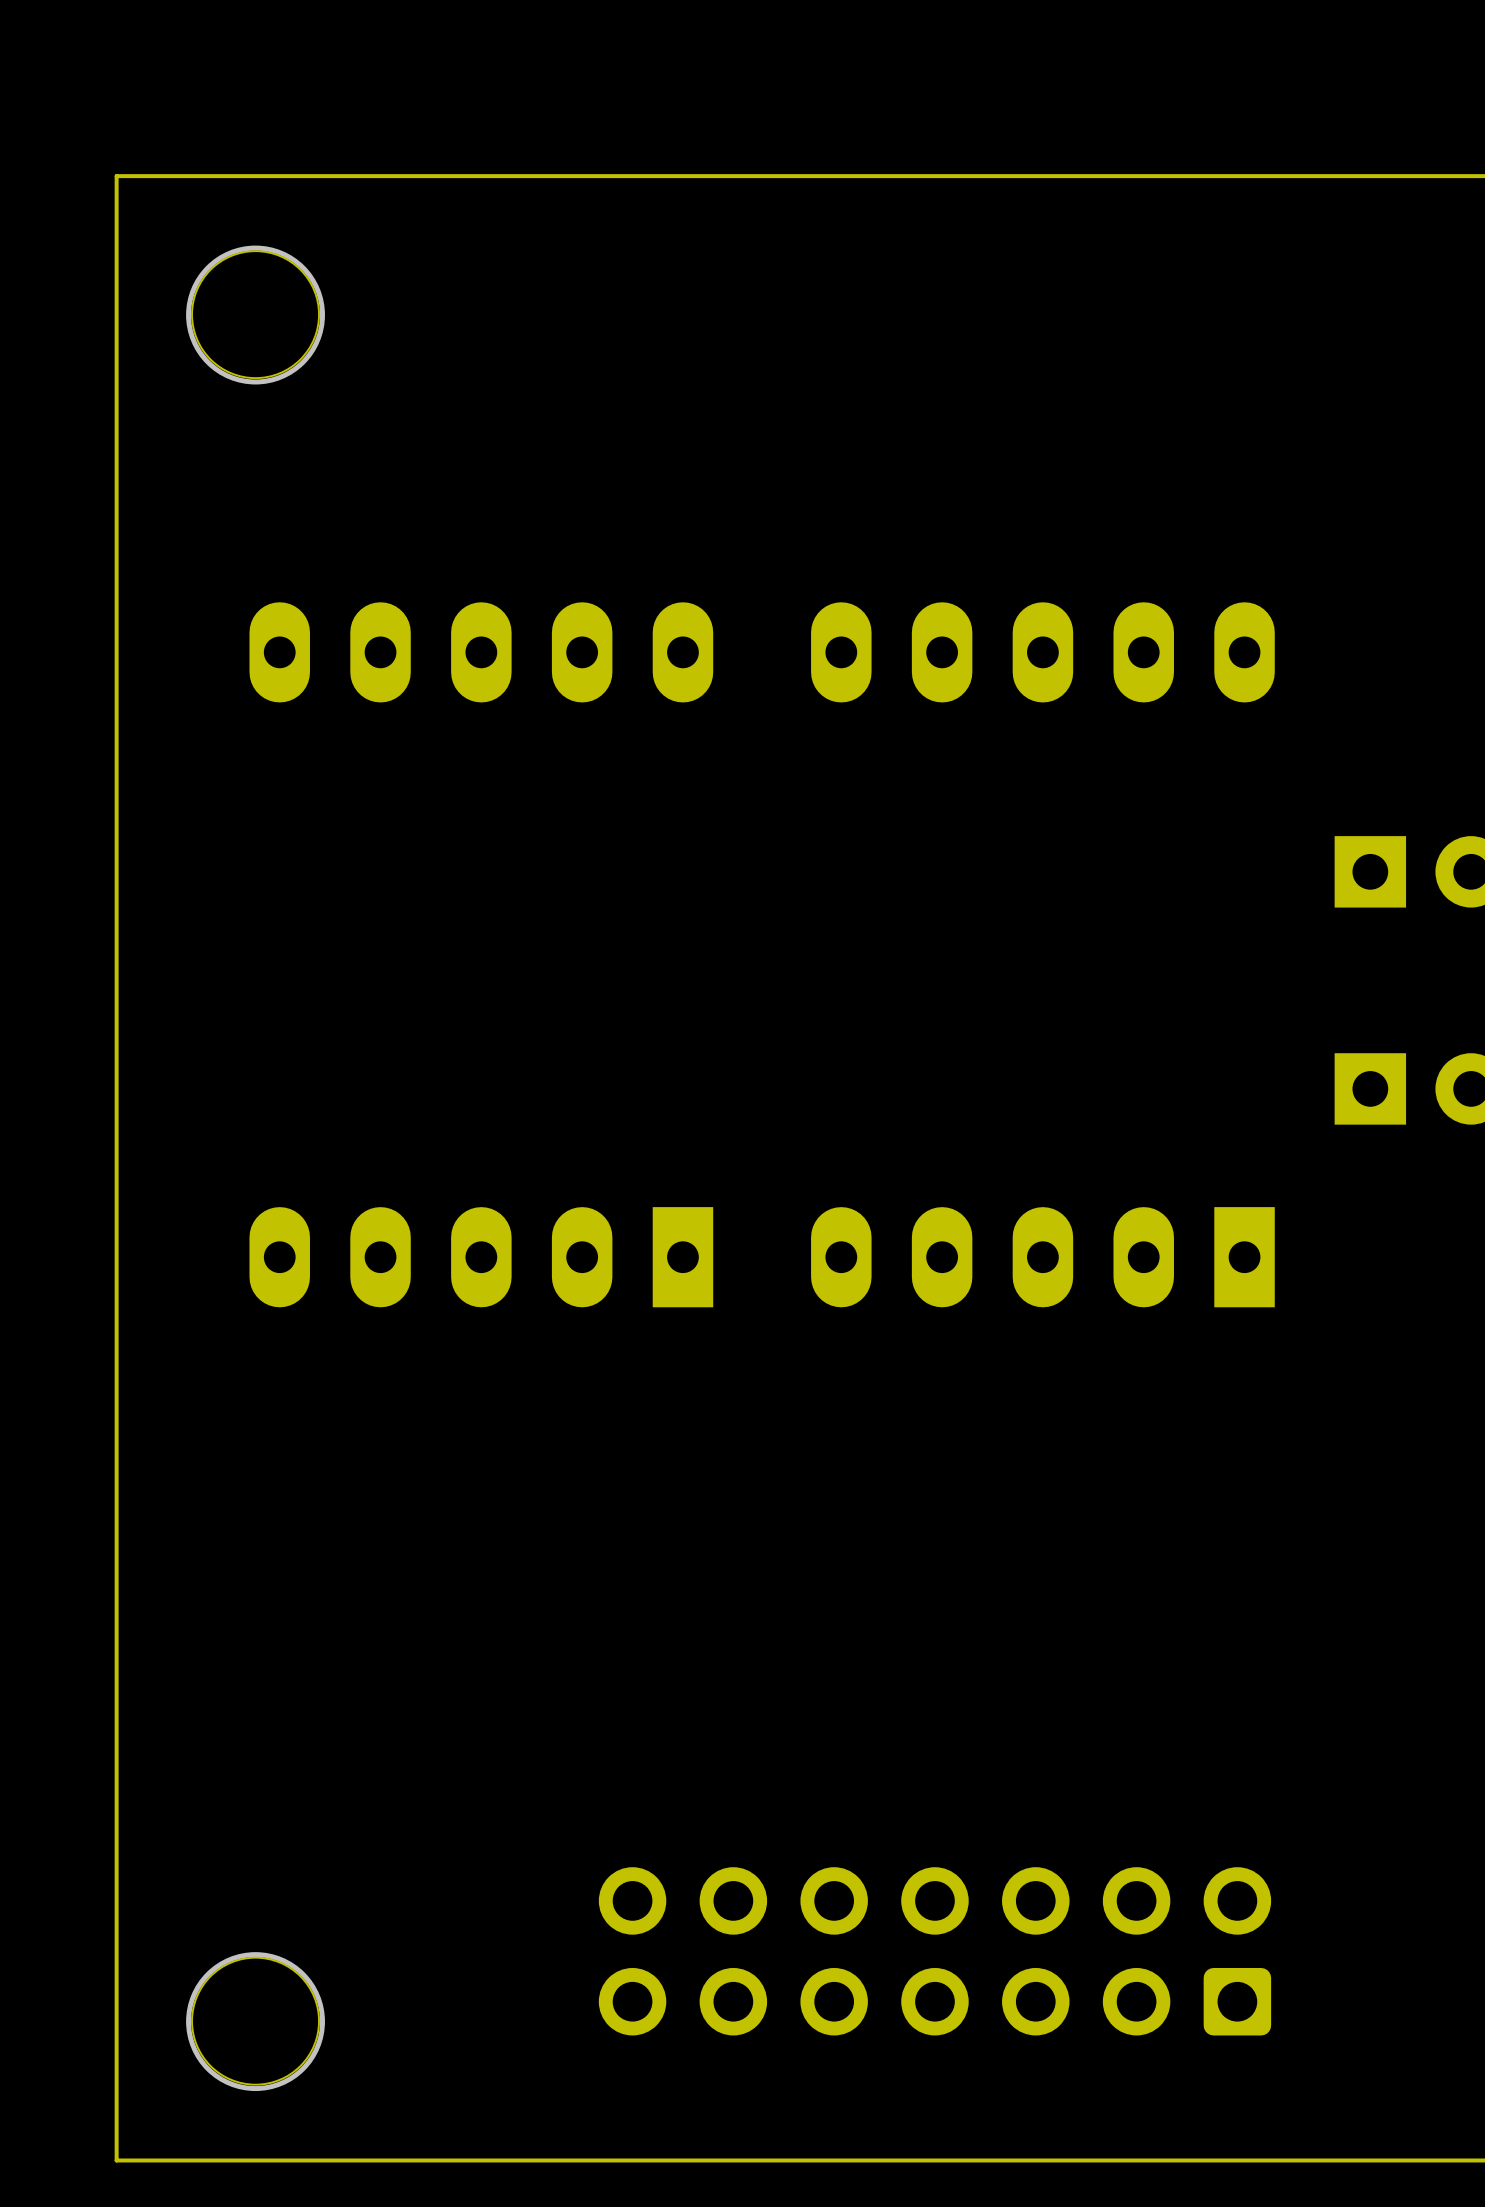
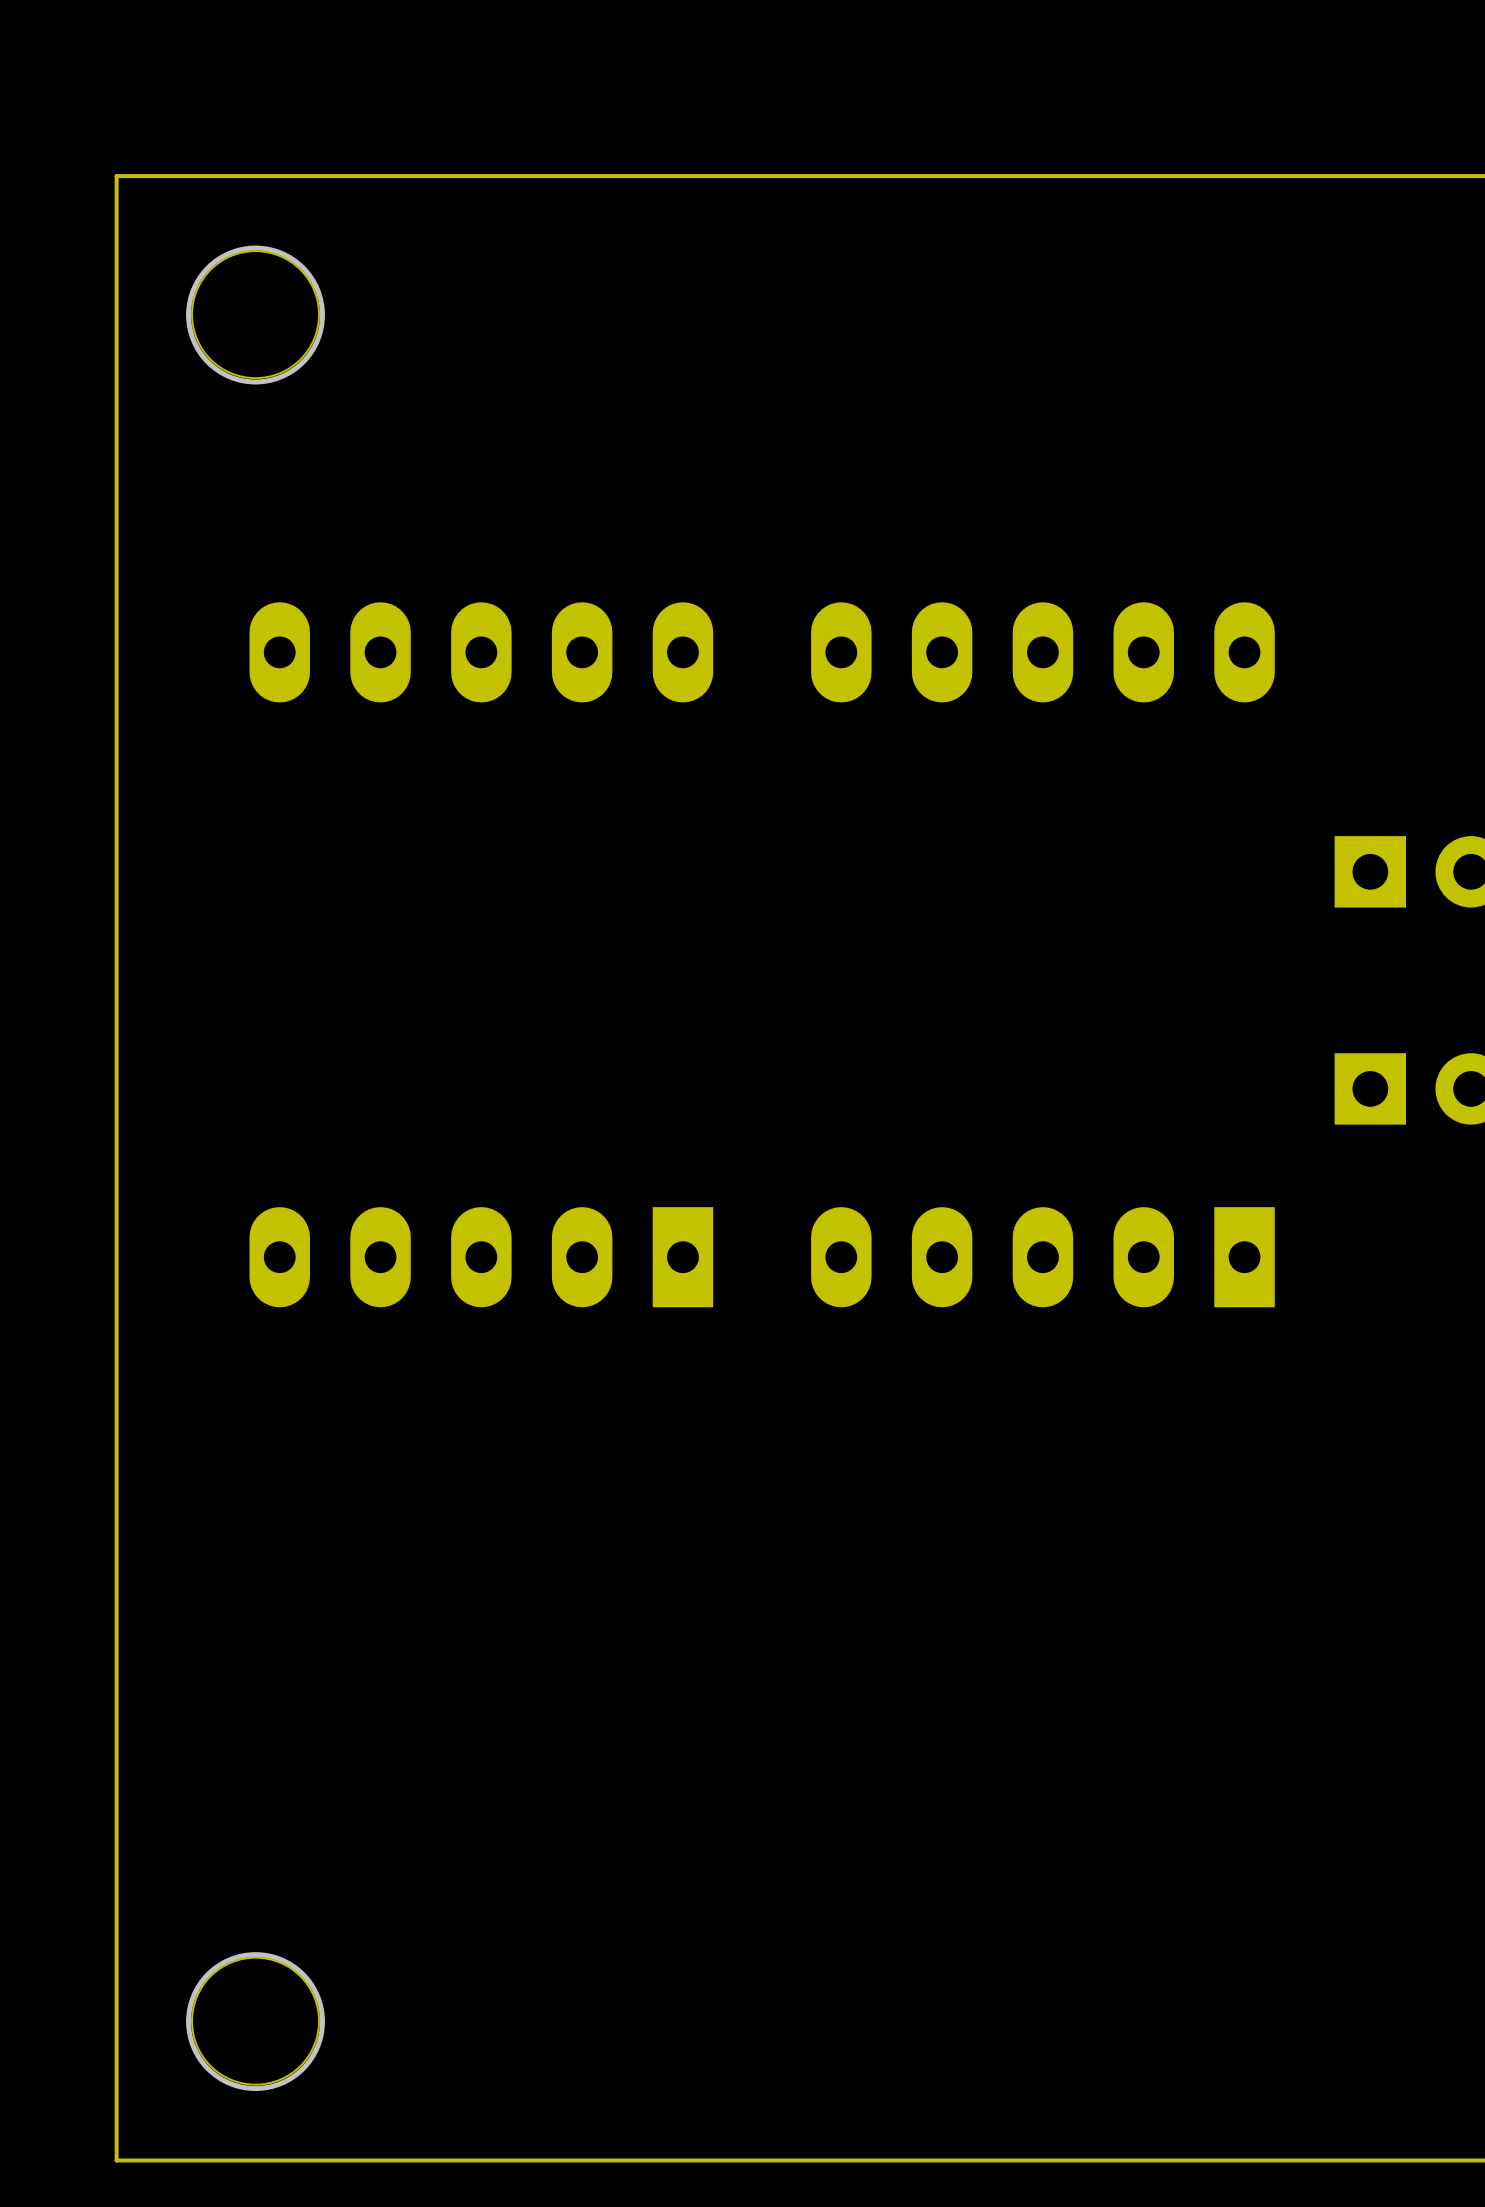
part: (934, 1951) -> none

